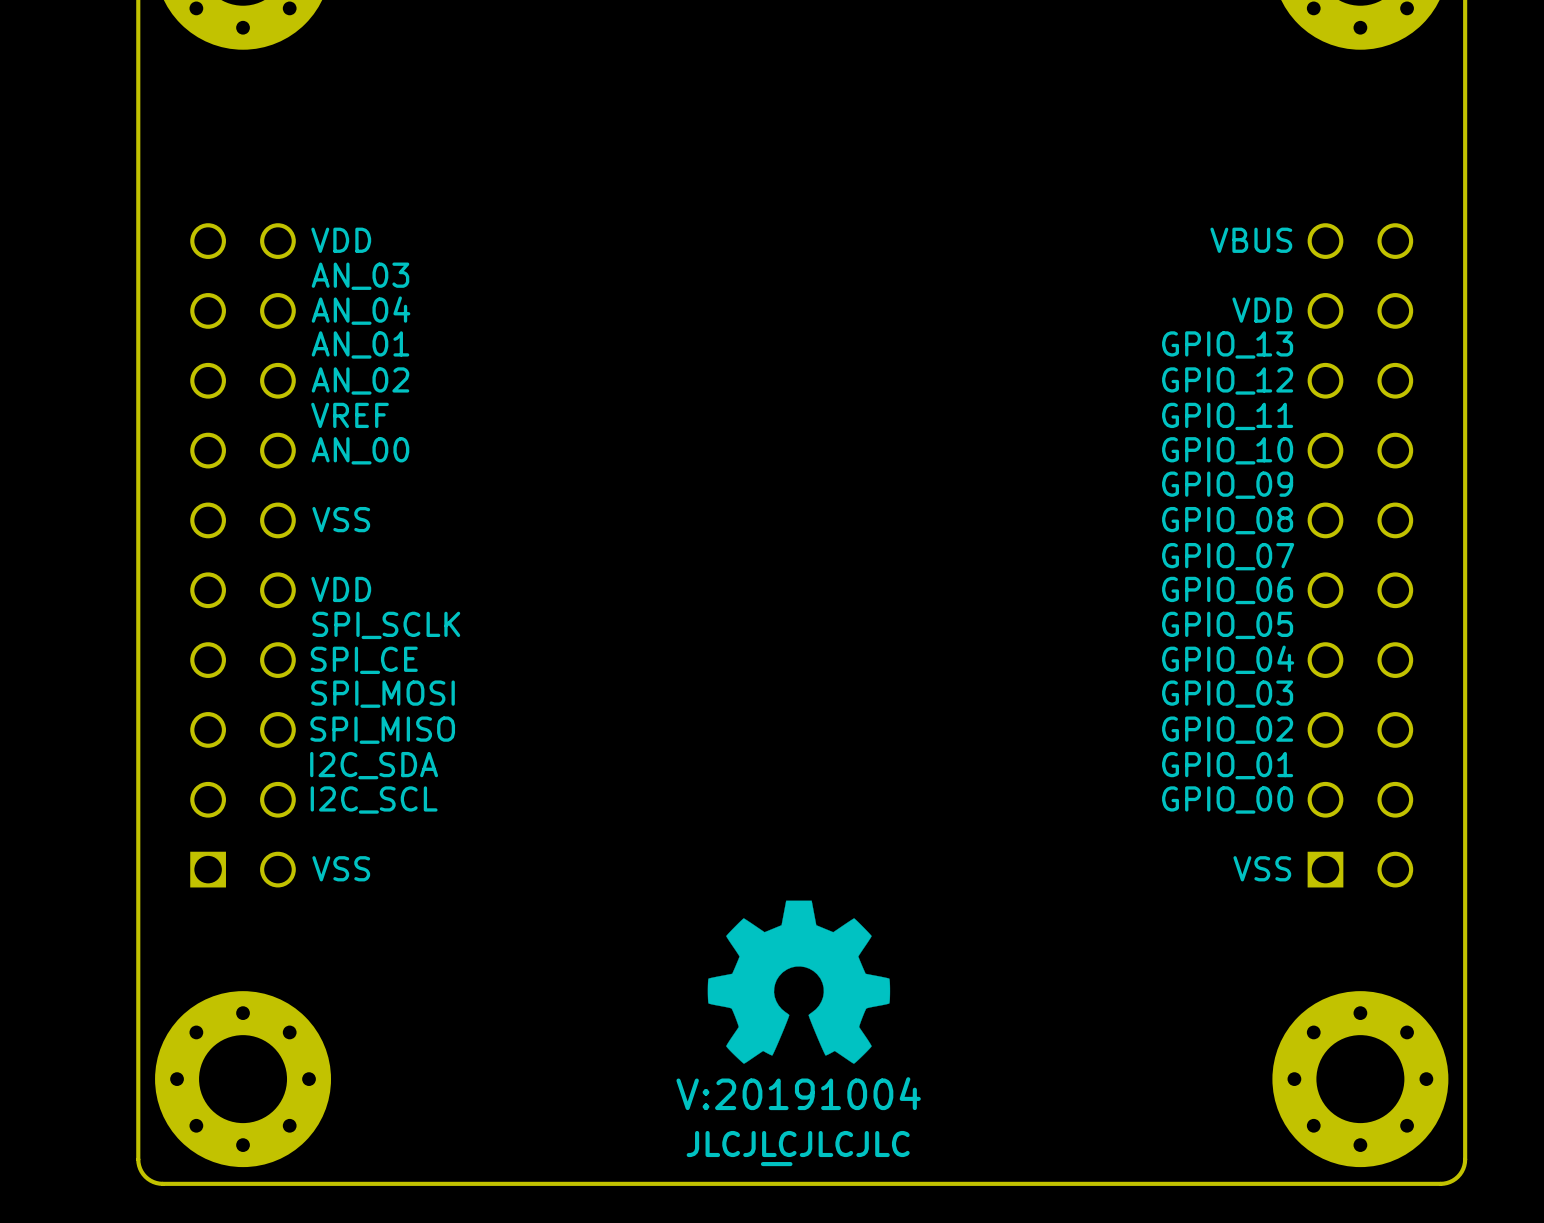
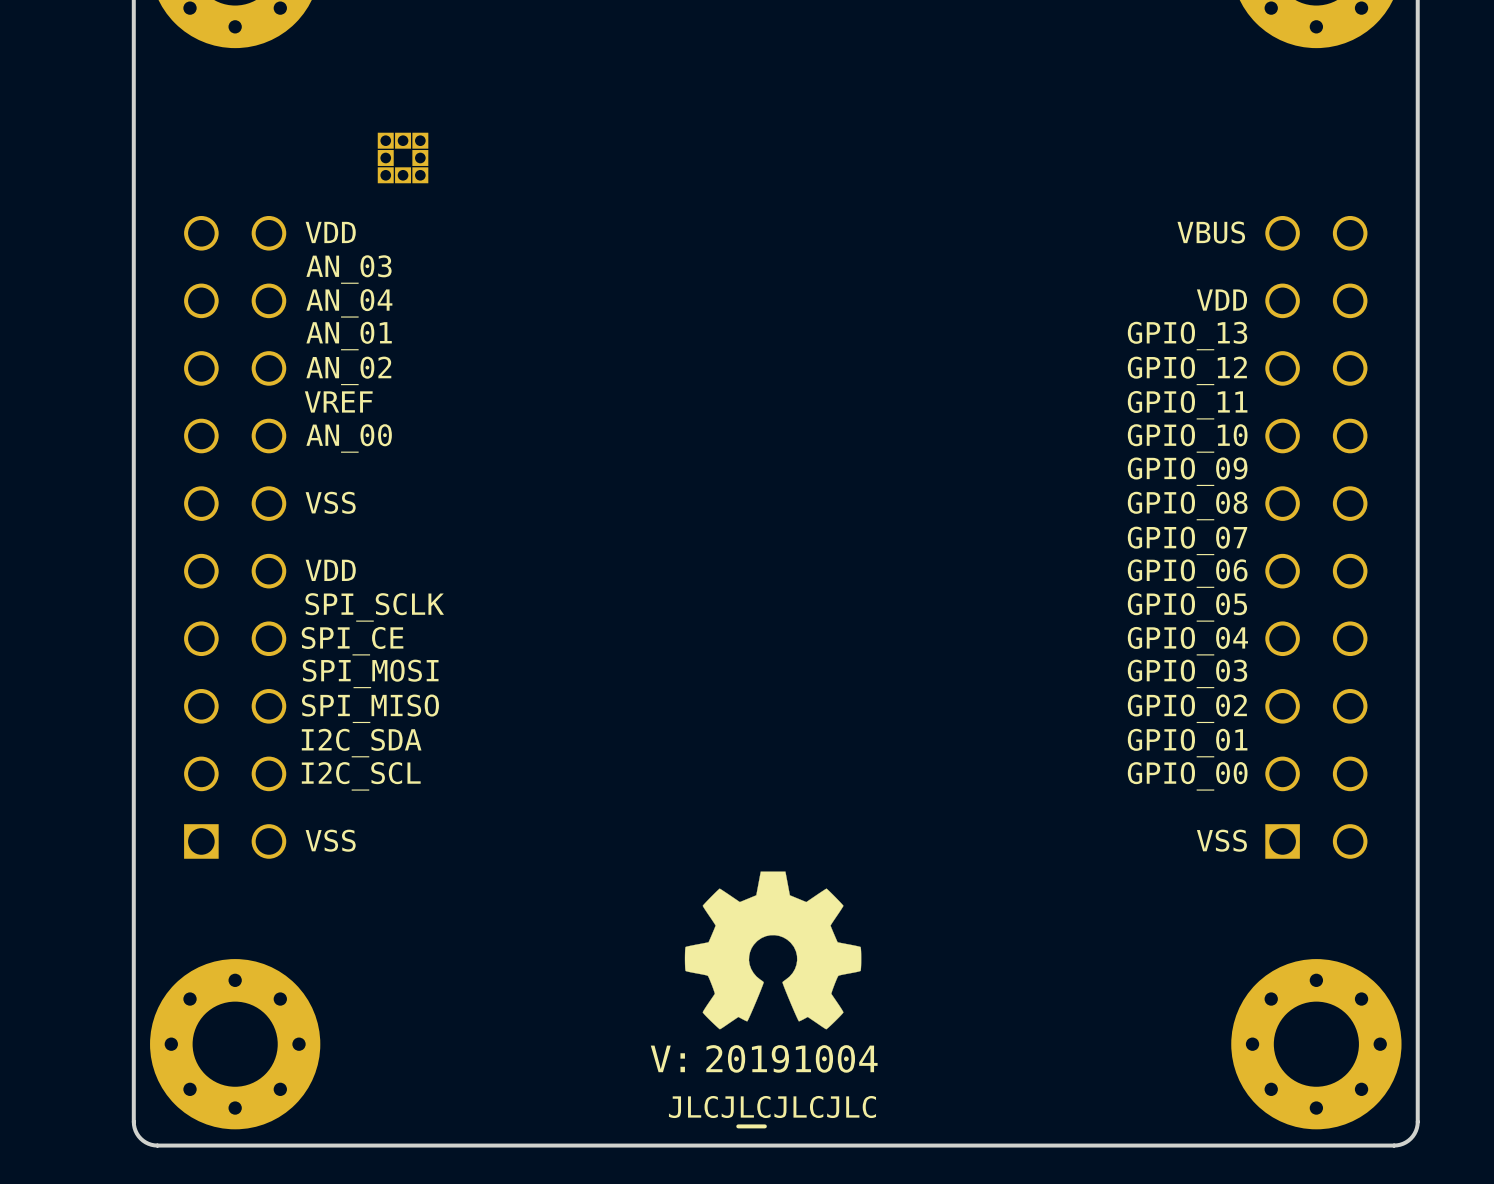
part: none -> (403, 157)

